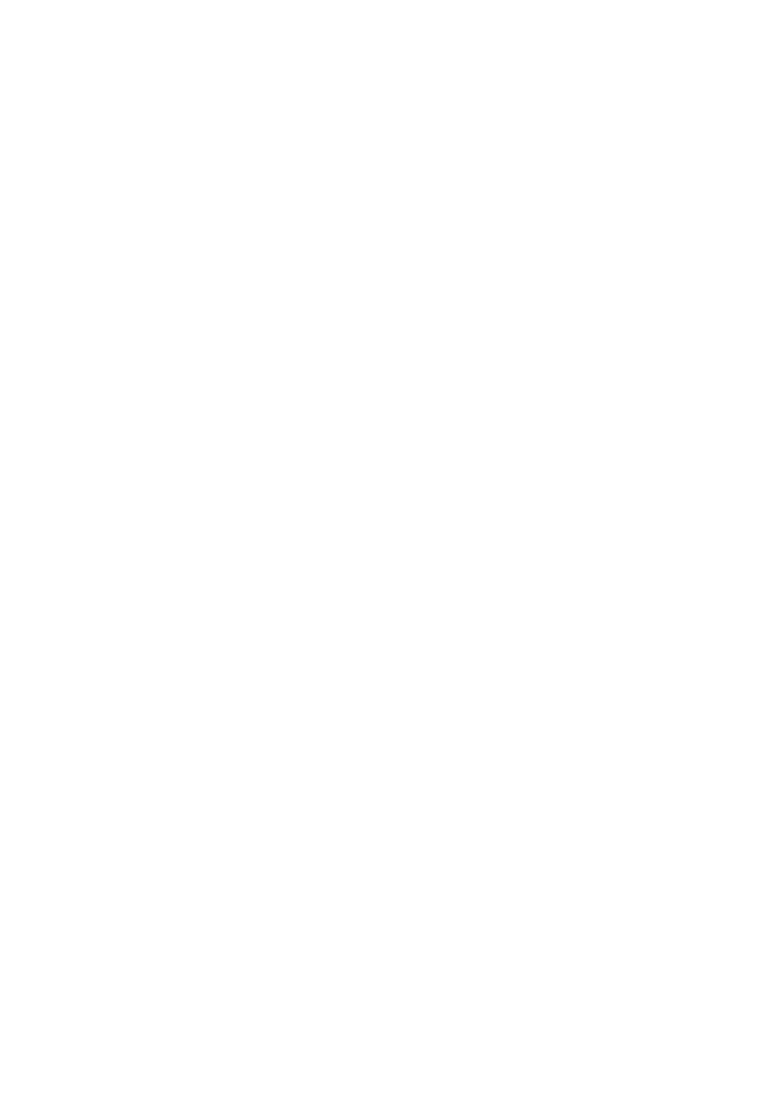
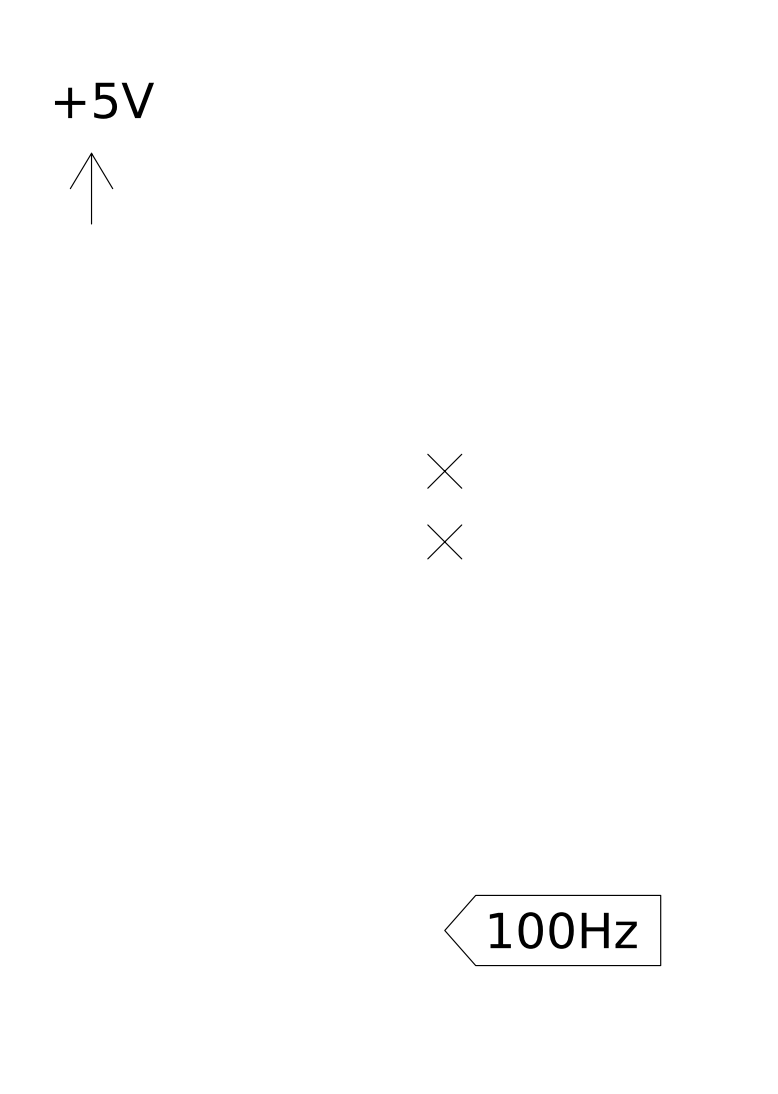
power symbol: none -> +5V (91, 188)
no-connect mark: none -> (444, 471)
no-connect mark: none -> (444, 541)
global label: none -> 100Hz (563, 930)

